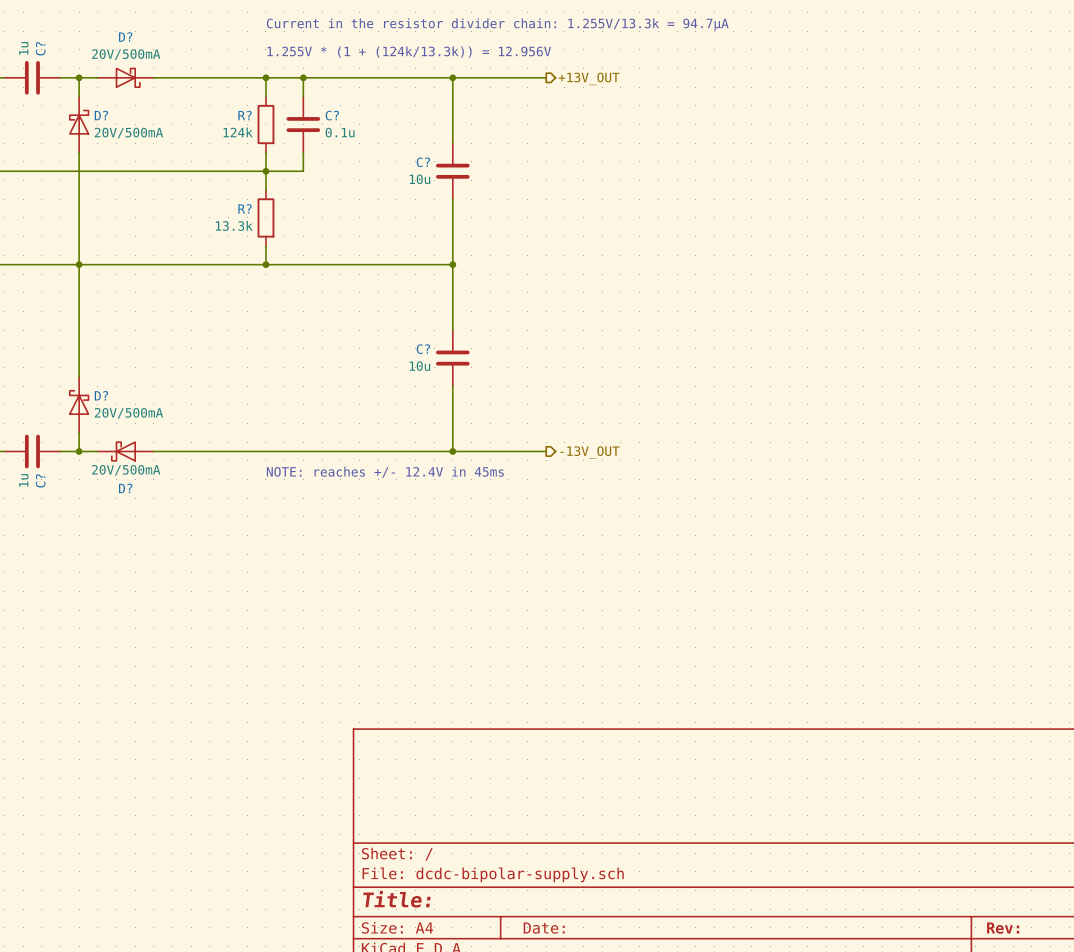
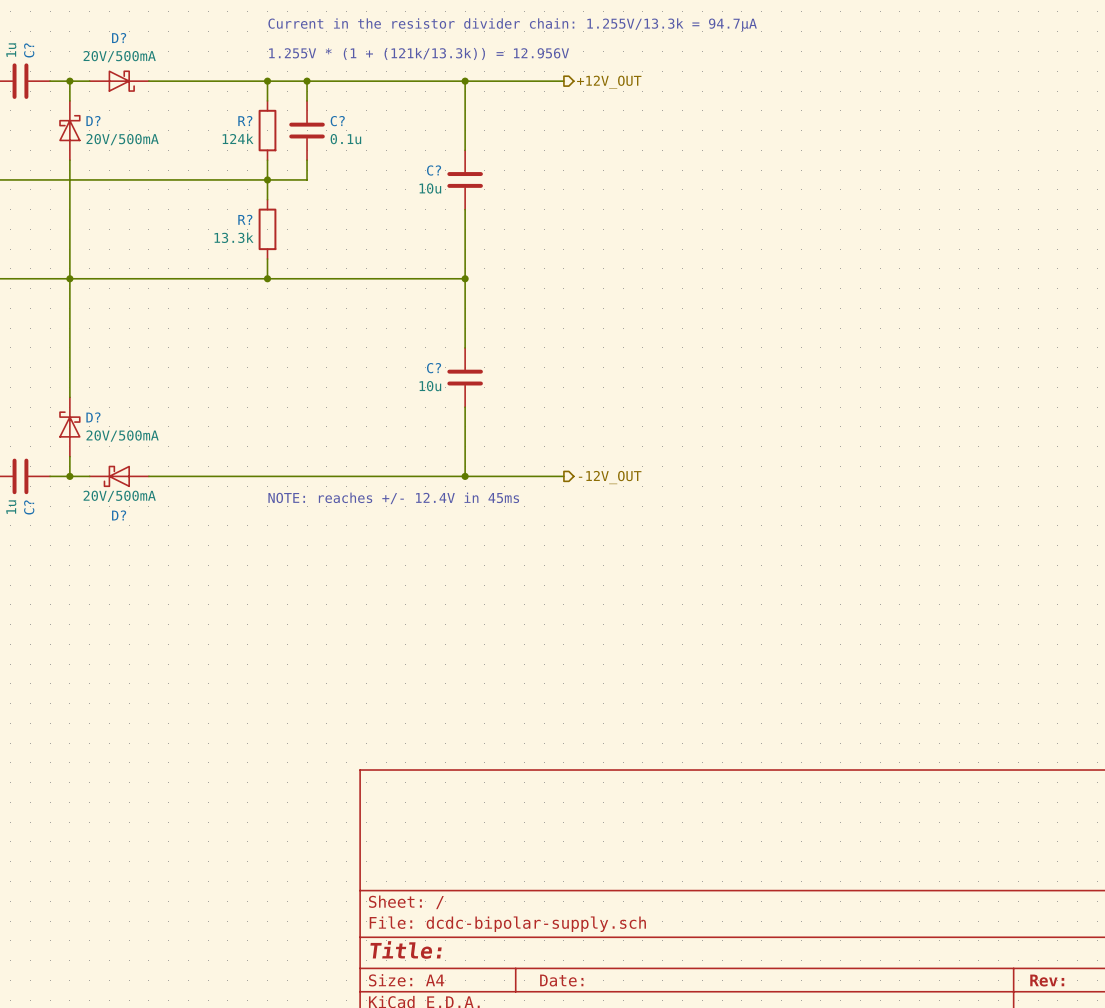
text: 1.255V * (1 + (124k/13.3k)) = 12.956V (409, 52) -> 1.255V * (1 + (121k/13.3k)) = 12.956V (419, 53)
hierarchical label: +13V_OUT (589, 78) -> +12V_OUT (609, 82)
hierarchical label: -13V_OUT (589, 452) -> -12V_OUT (610, 477)

